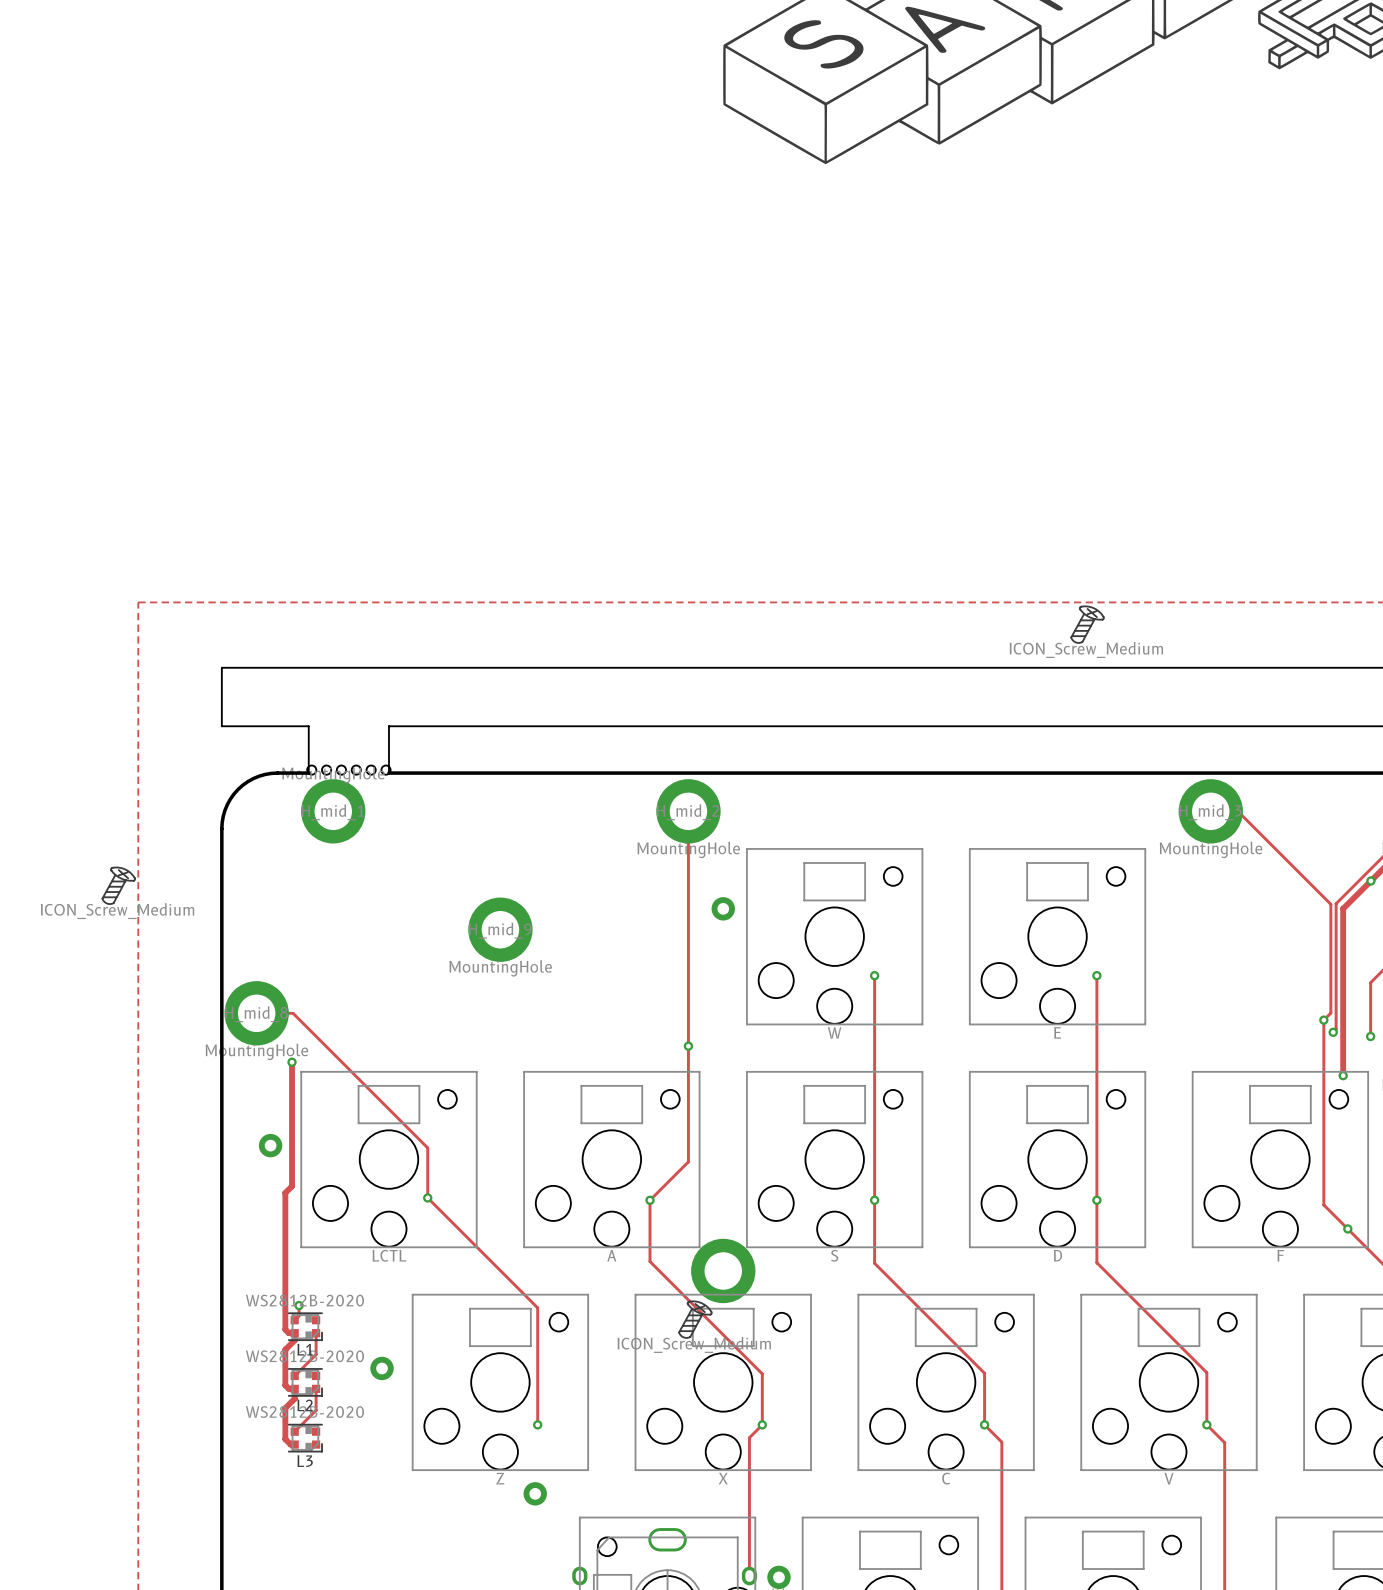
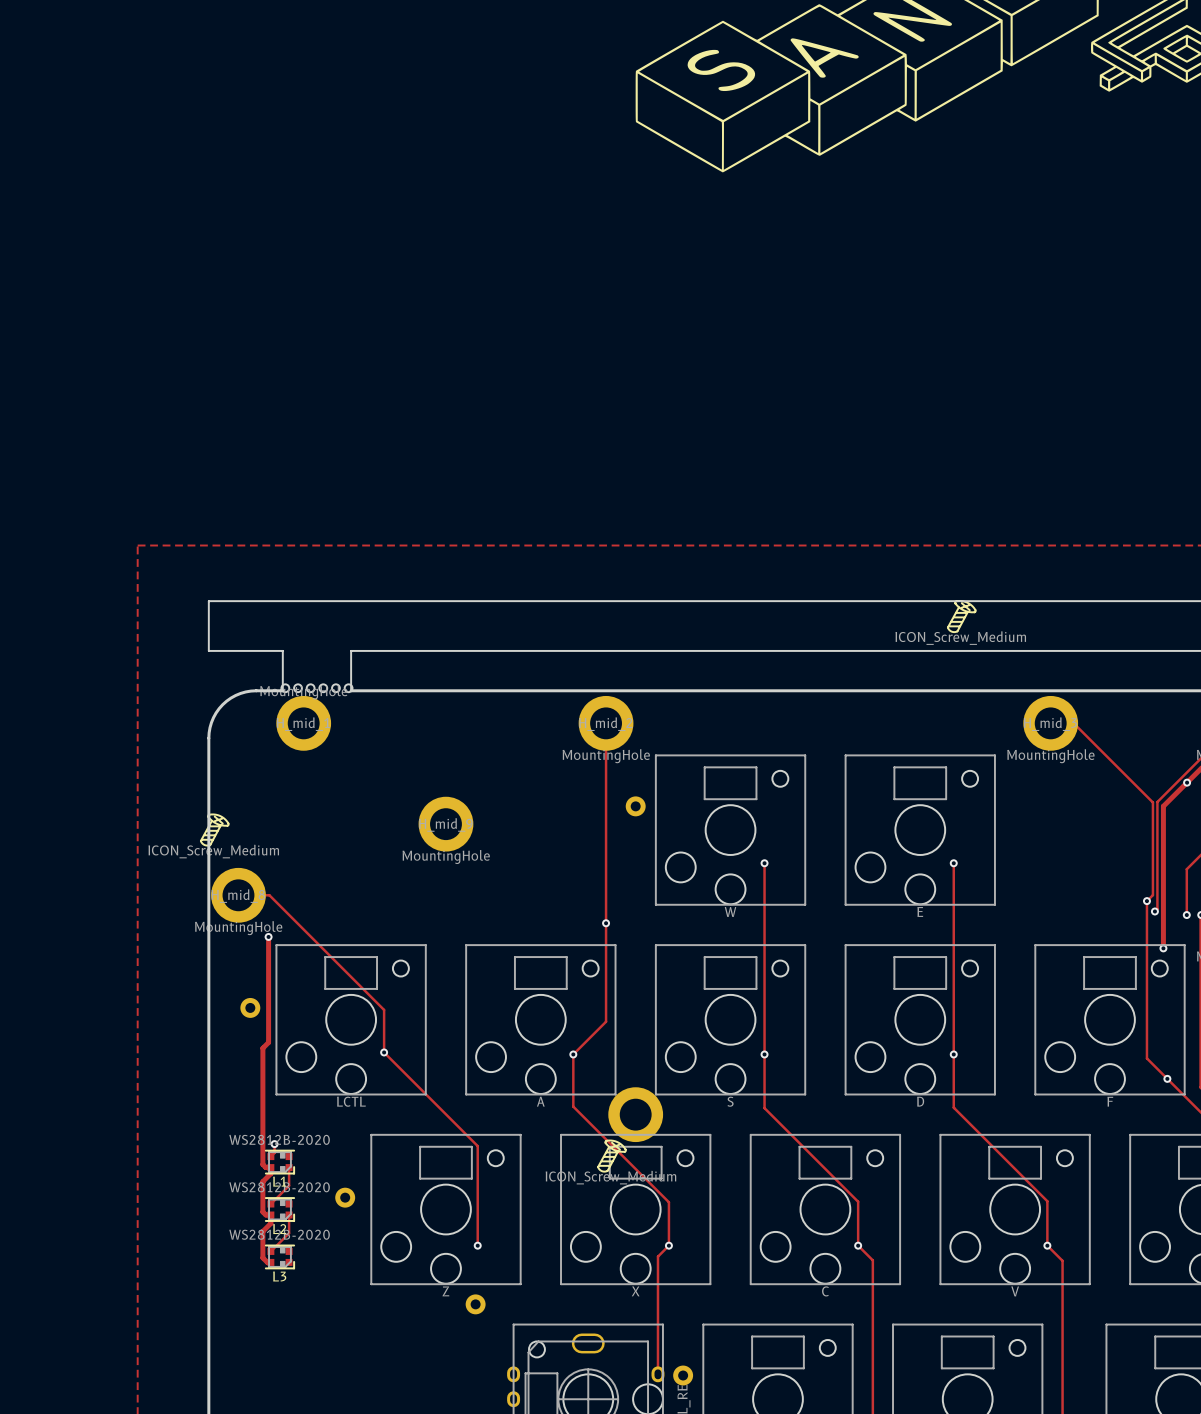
drawing position: (1087, 624) -> (961, 616)
drawing position: (118, 885) -> (214, 829)

